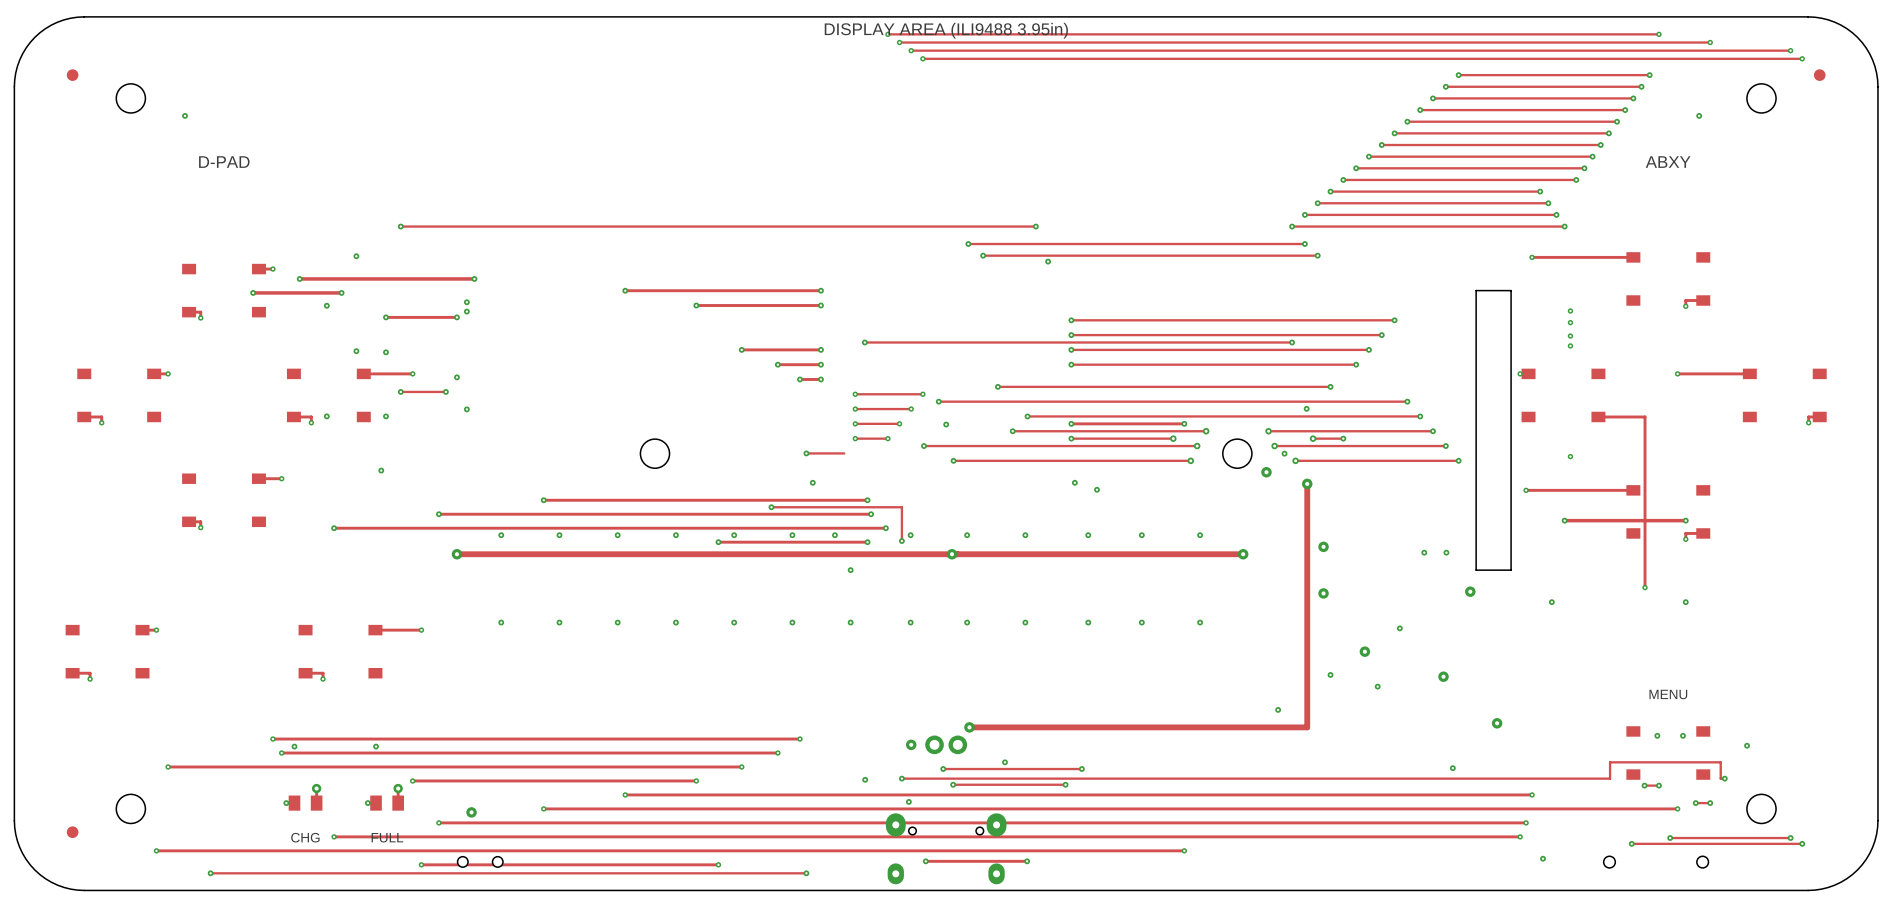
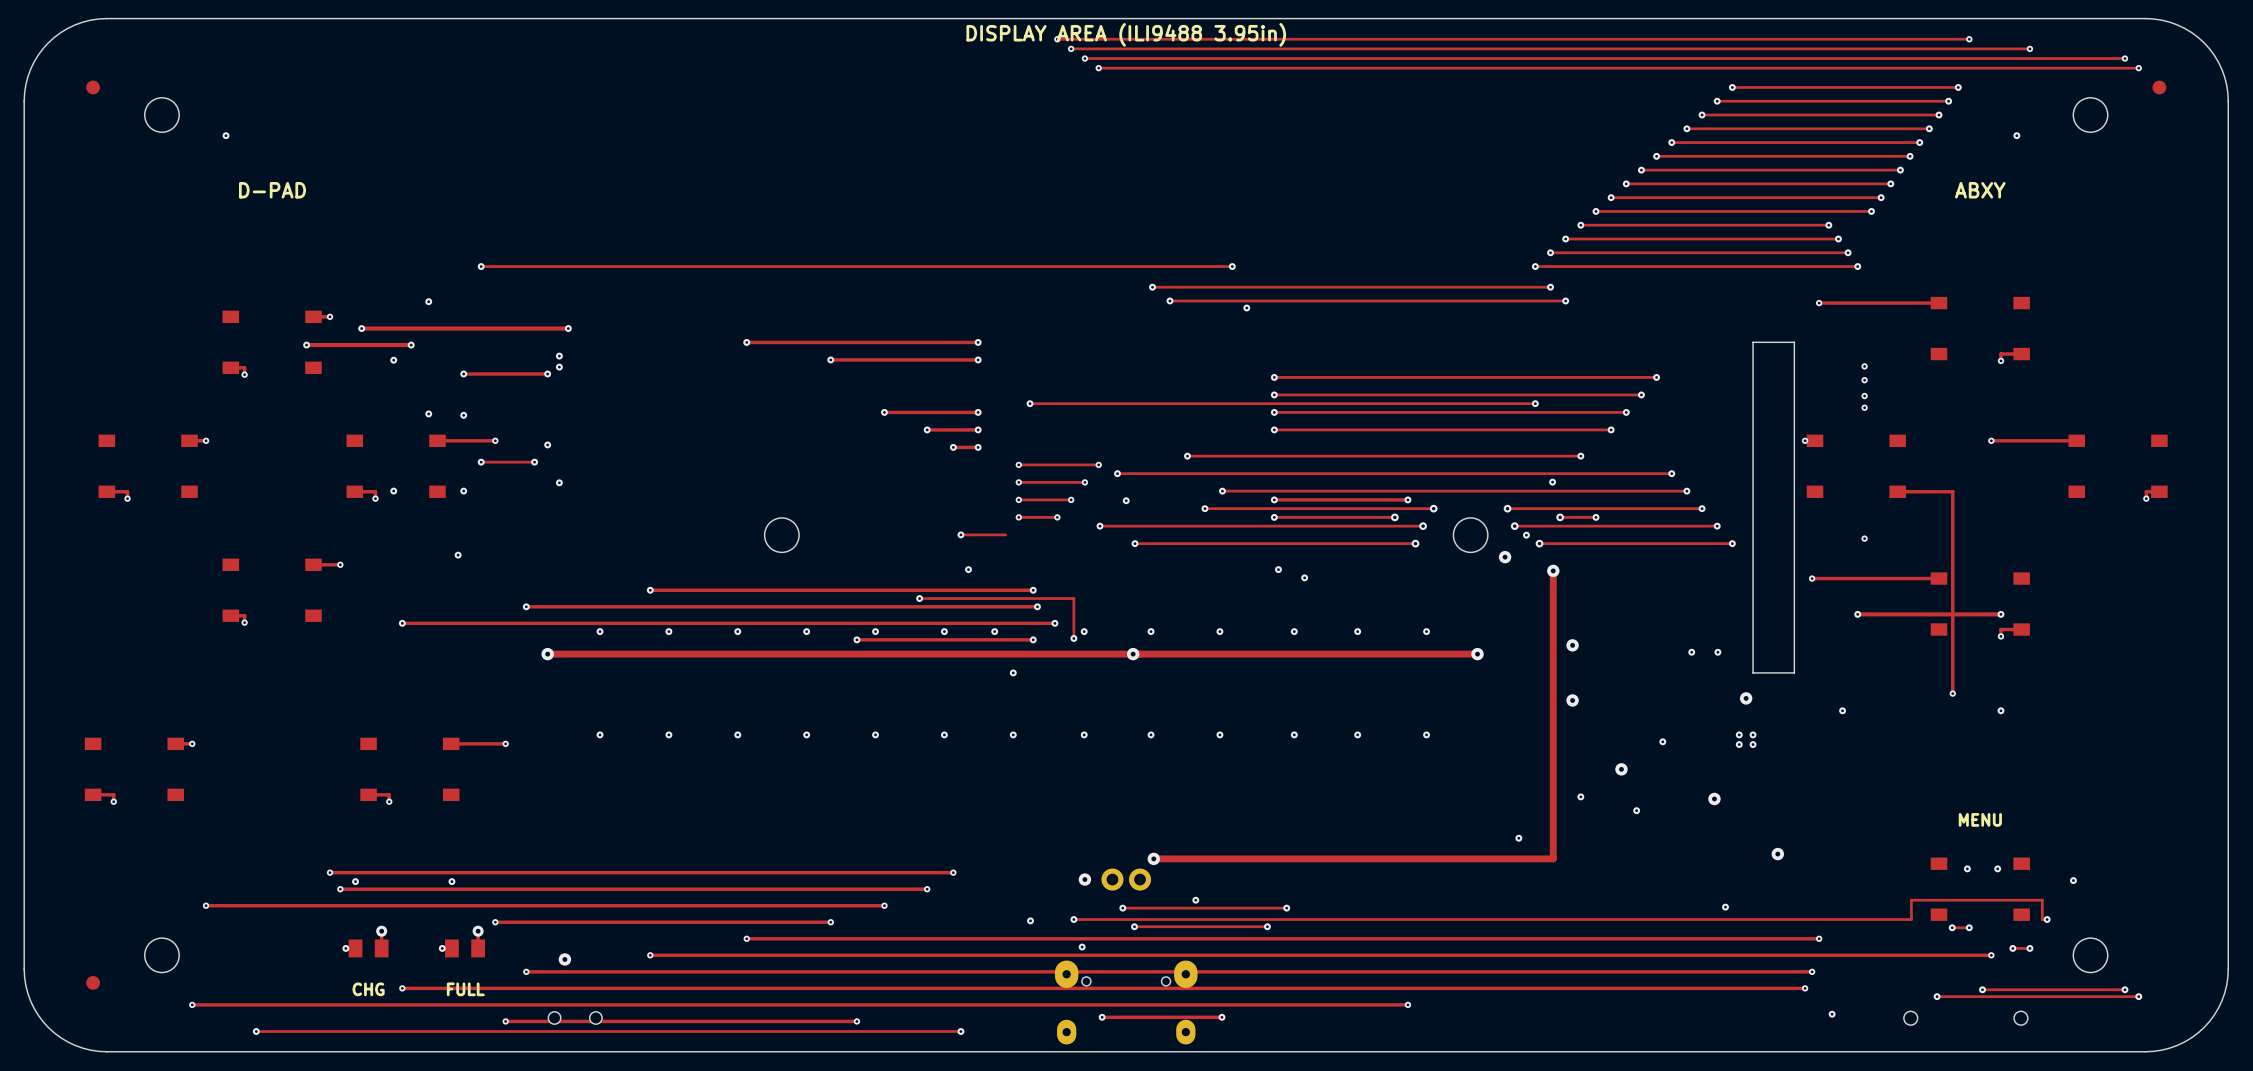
via: none -> (1739, 734)
via: none -> (1753, 734)
via: none -> (1739, 744)
via: none -> (1753, 744)

